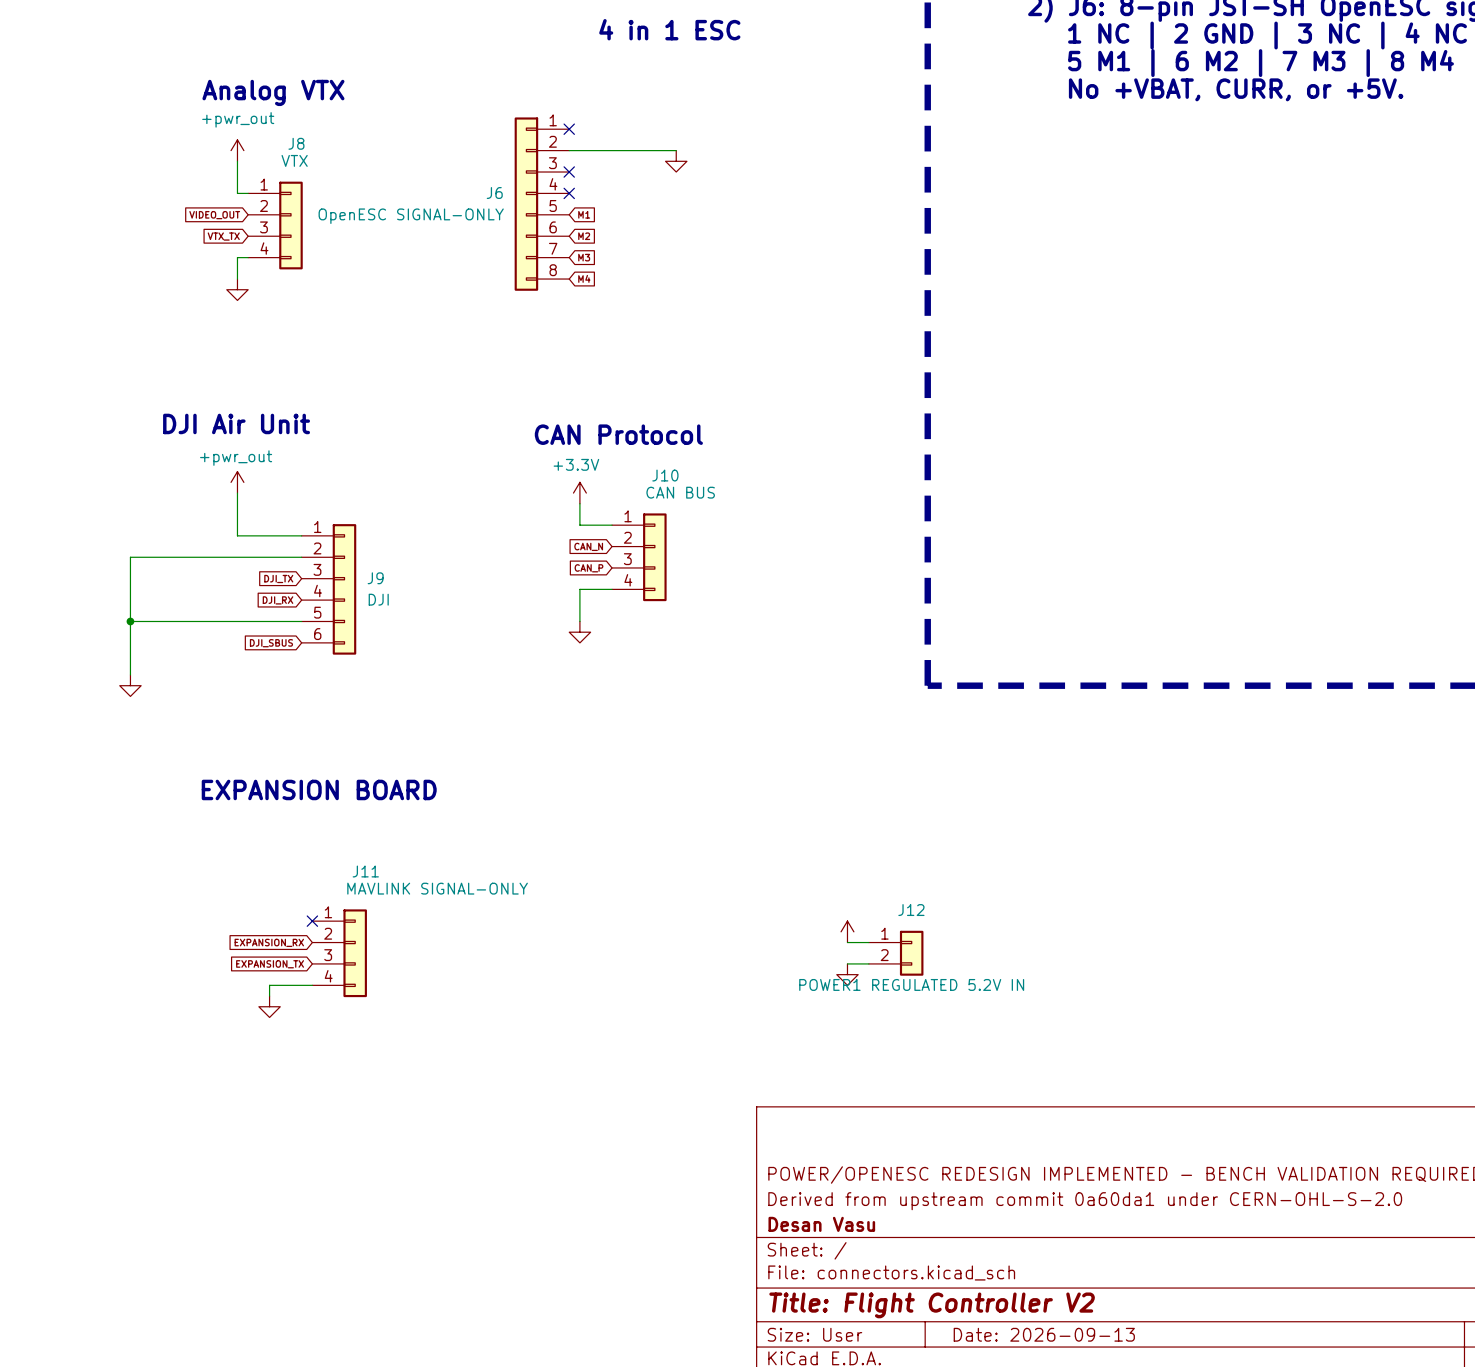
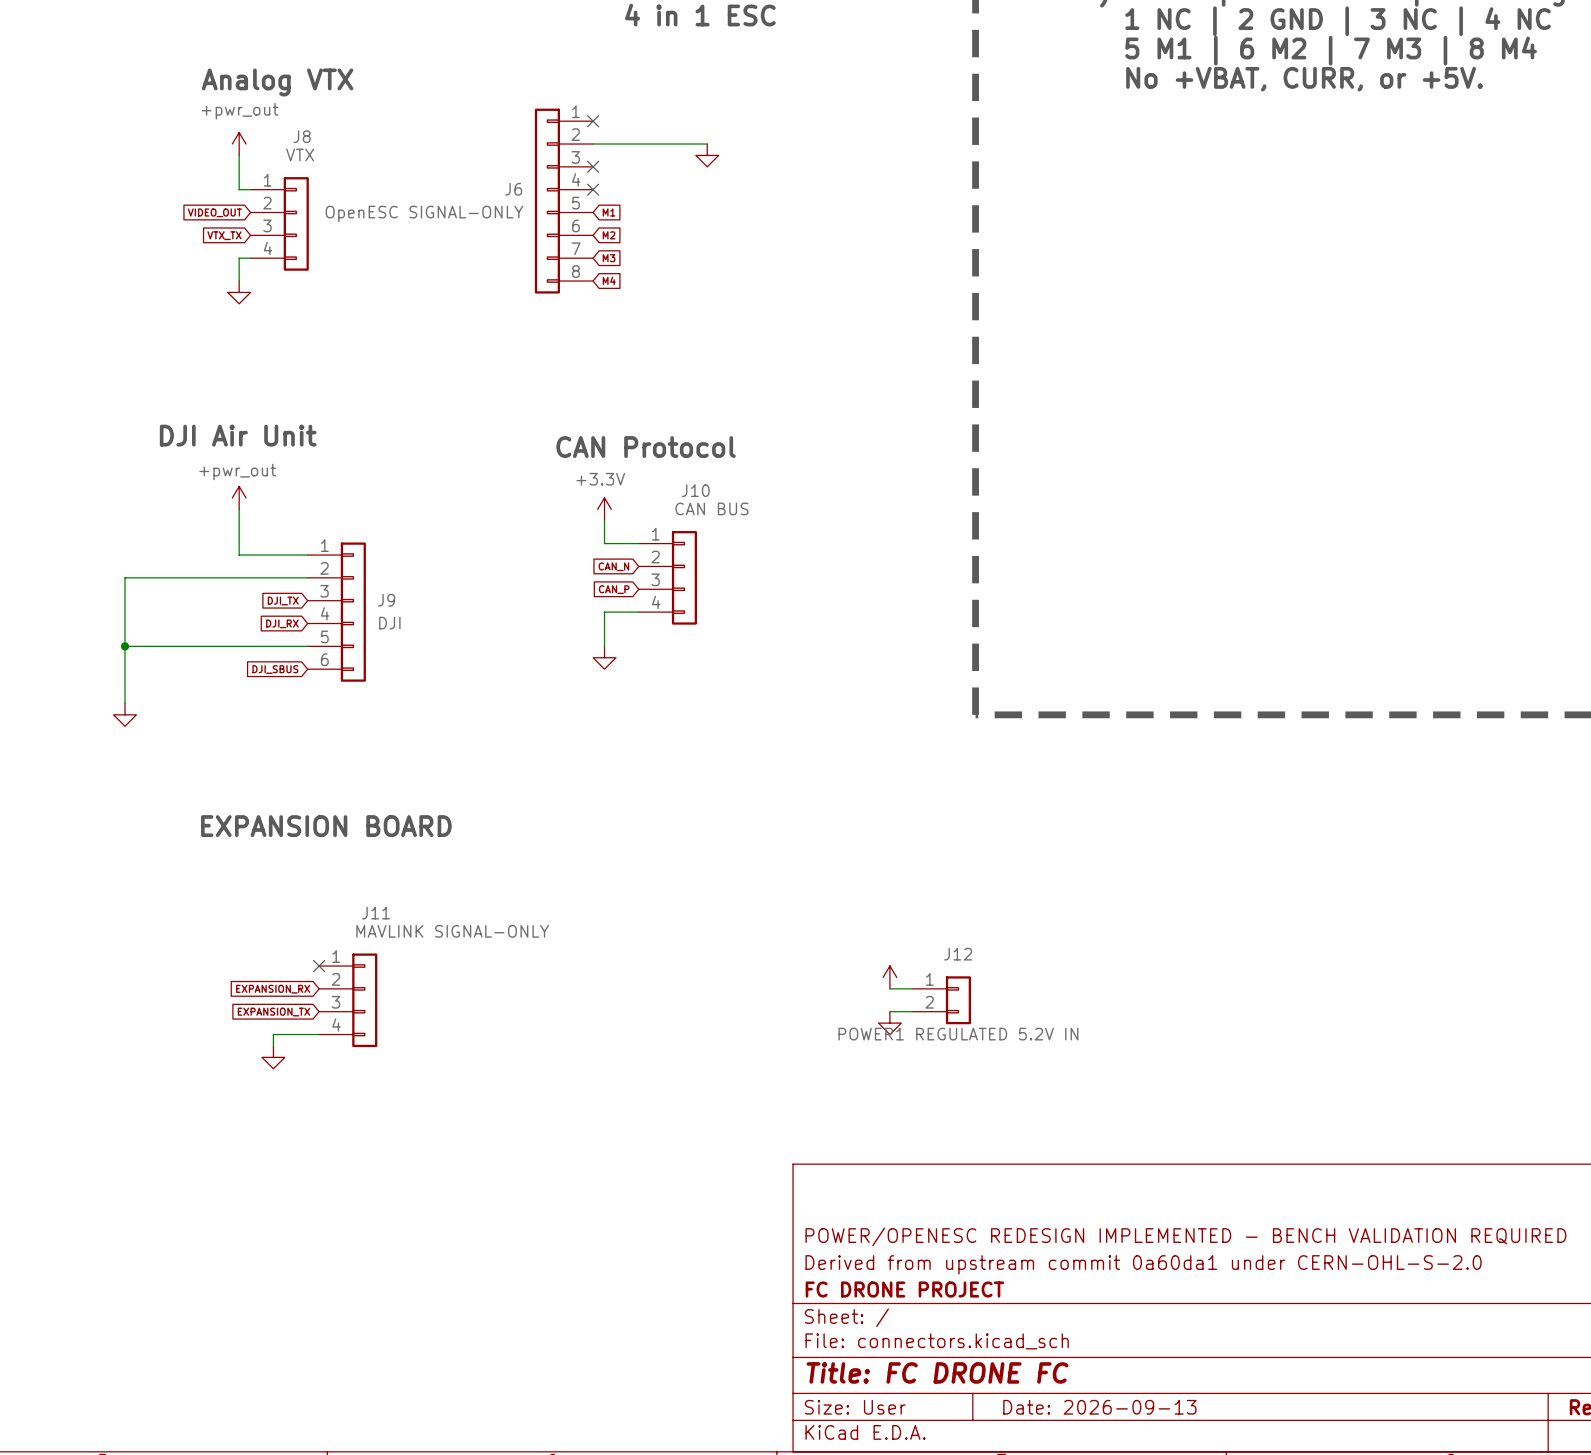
title block: Desan Vasu (821, 1224) -> FC DRONE PROJECT (904, 1289)
title block: Title: Flight Controller V2 (932, 1305) -> Title: FC DRONE FC (937, 1372)

